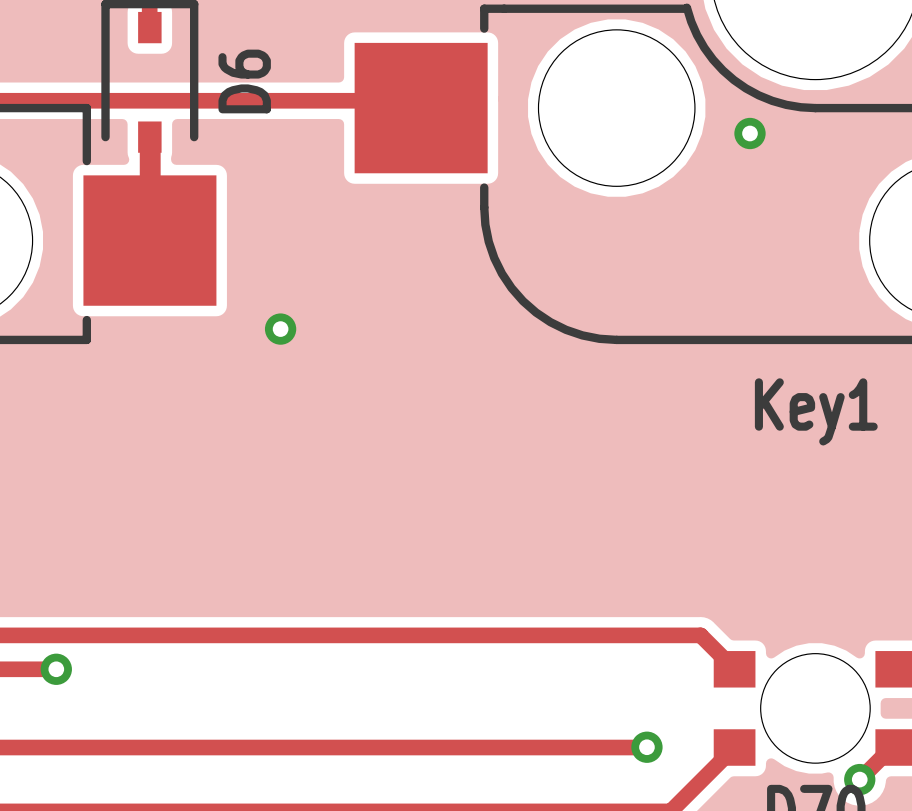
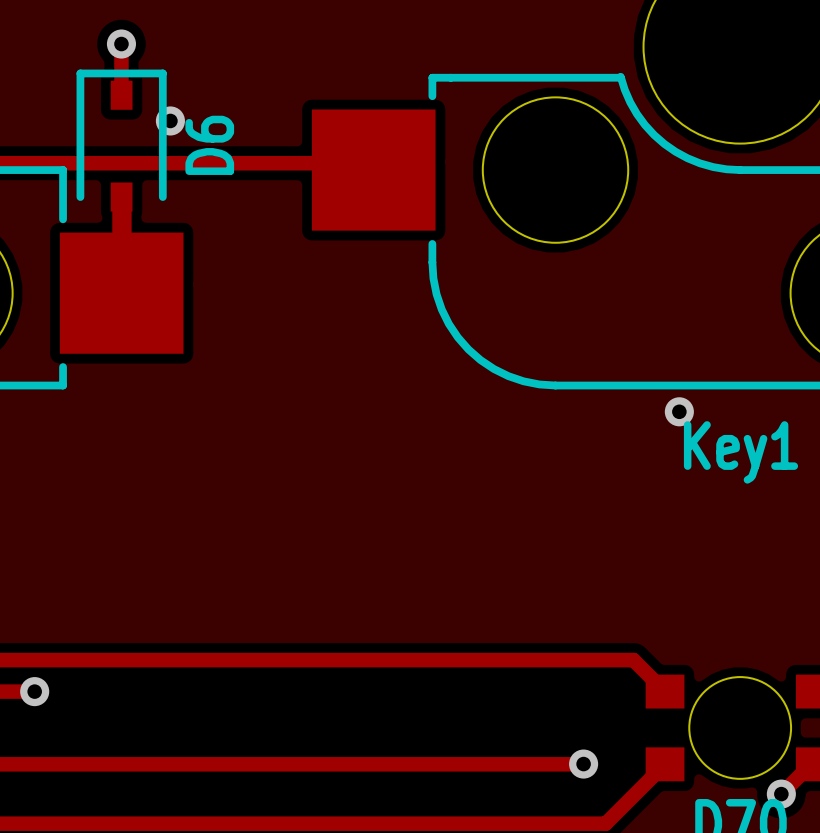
via: none -> (170, 120)
via position: (749, 133) -> (679, 411)
via: (280, 329) -> none

